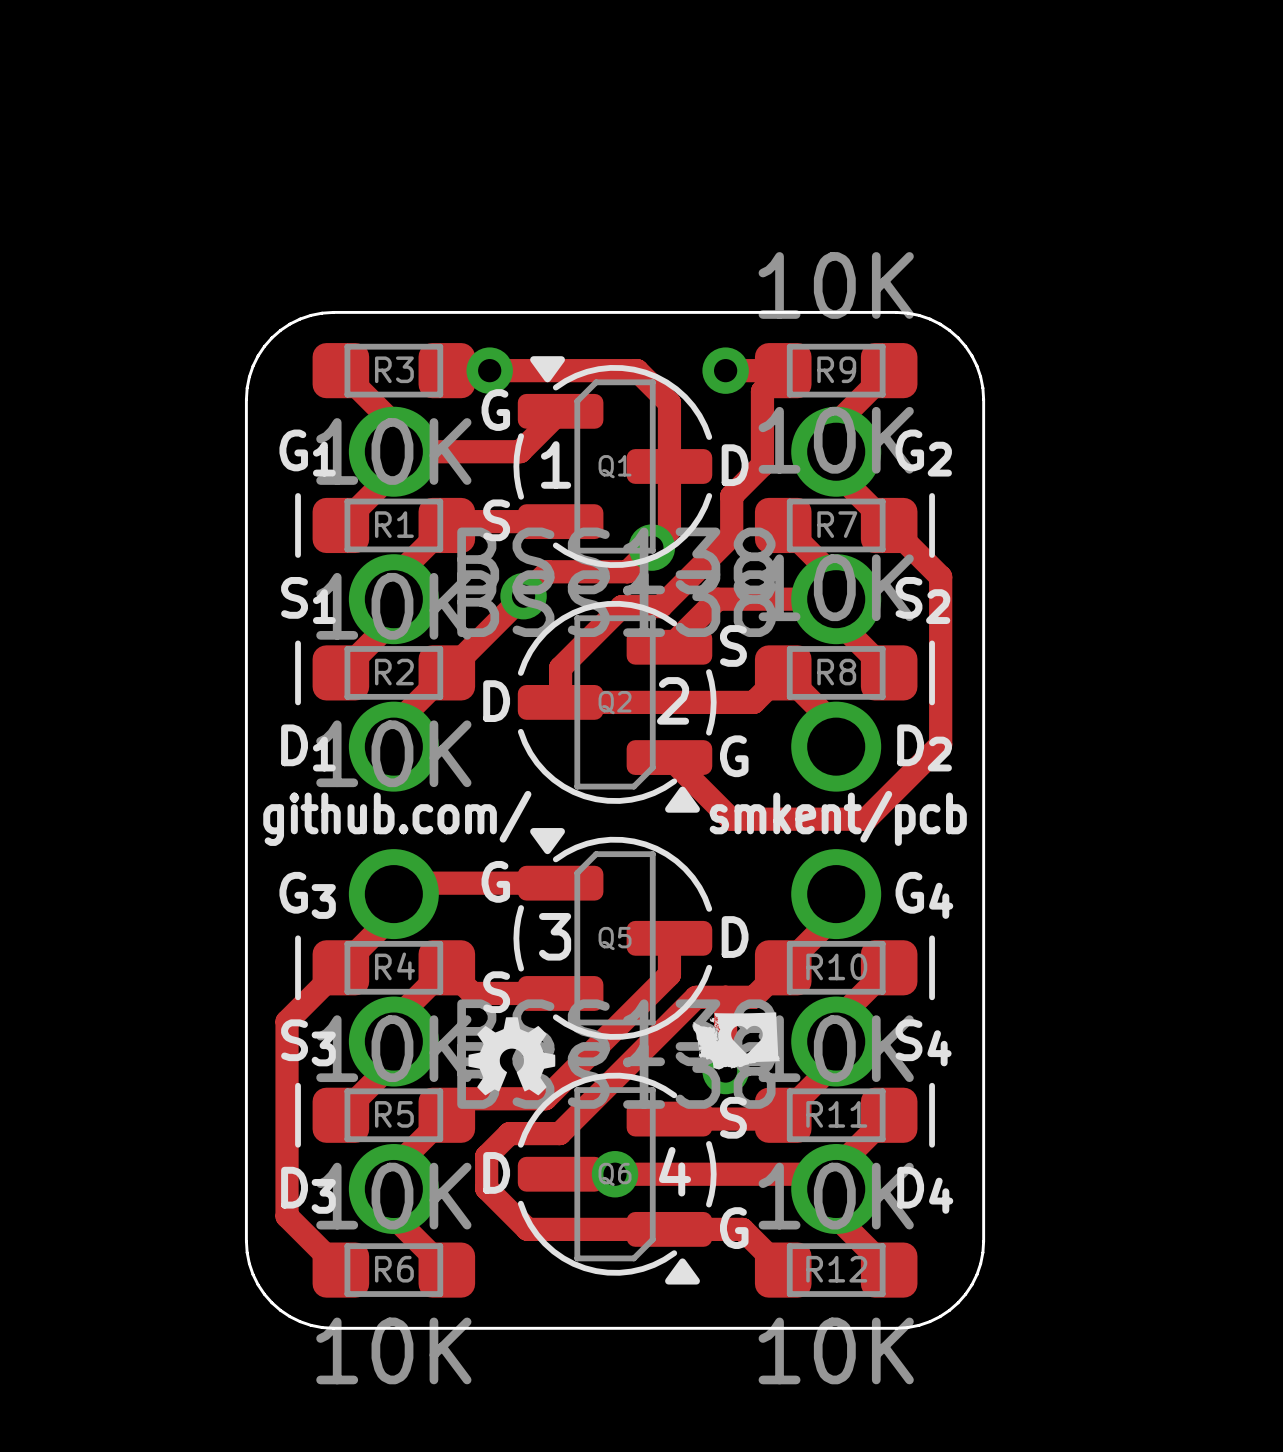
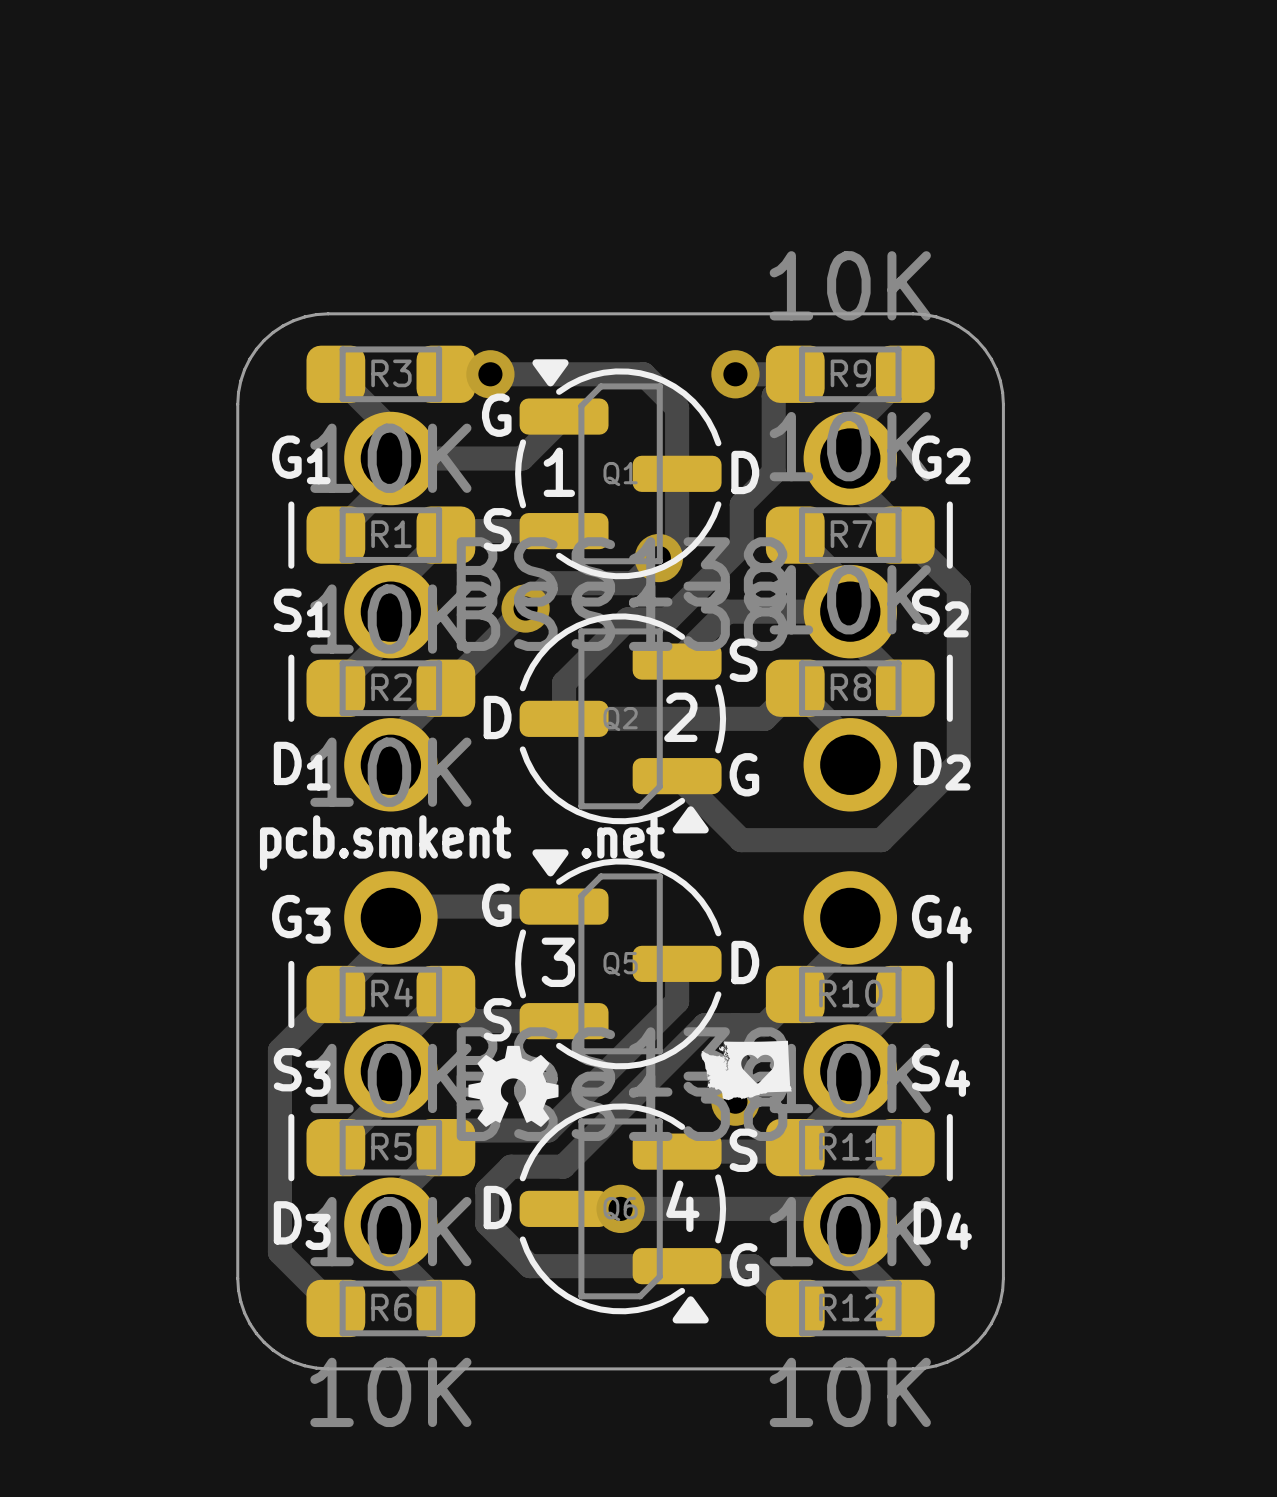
text: github.com/ smkent/pcb (615, 818) -> none
text: none -> pcb.smkent .net (462, 842)

